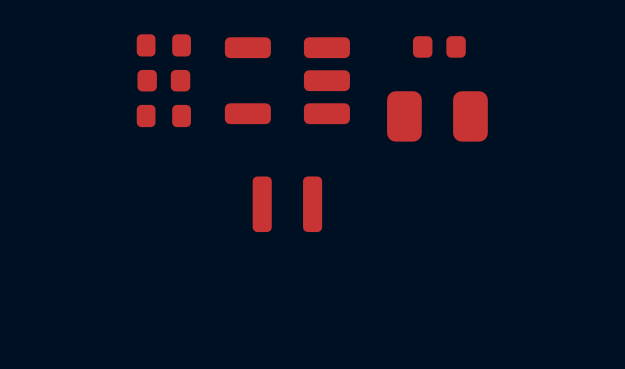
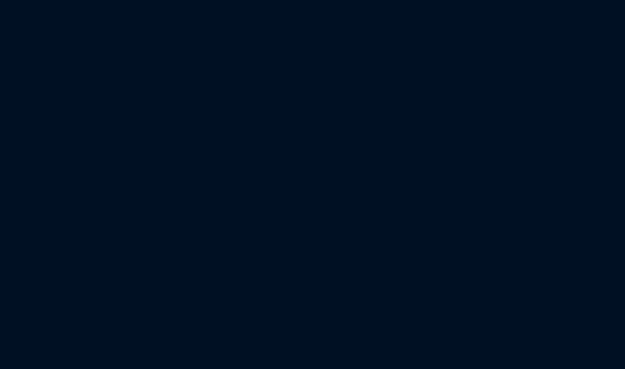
part: (163, 45) -> none
part: (439, 46) -> none
part: (163, 80) -> none
part: (287, 80) -> none
part: (163, 116) -> none
part: (437, 116) -> none
part: (287, 204) -> none

